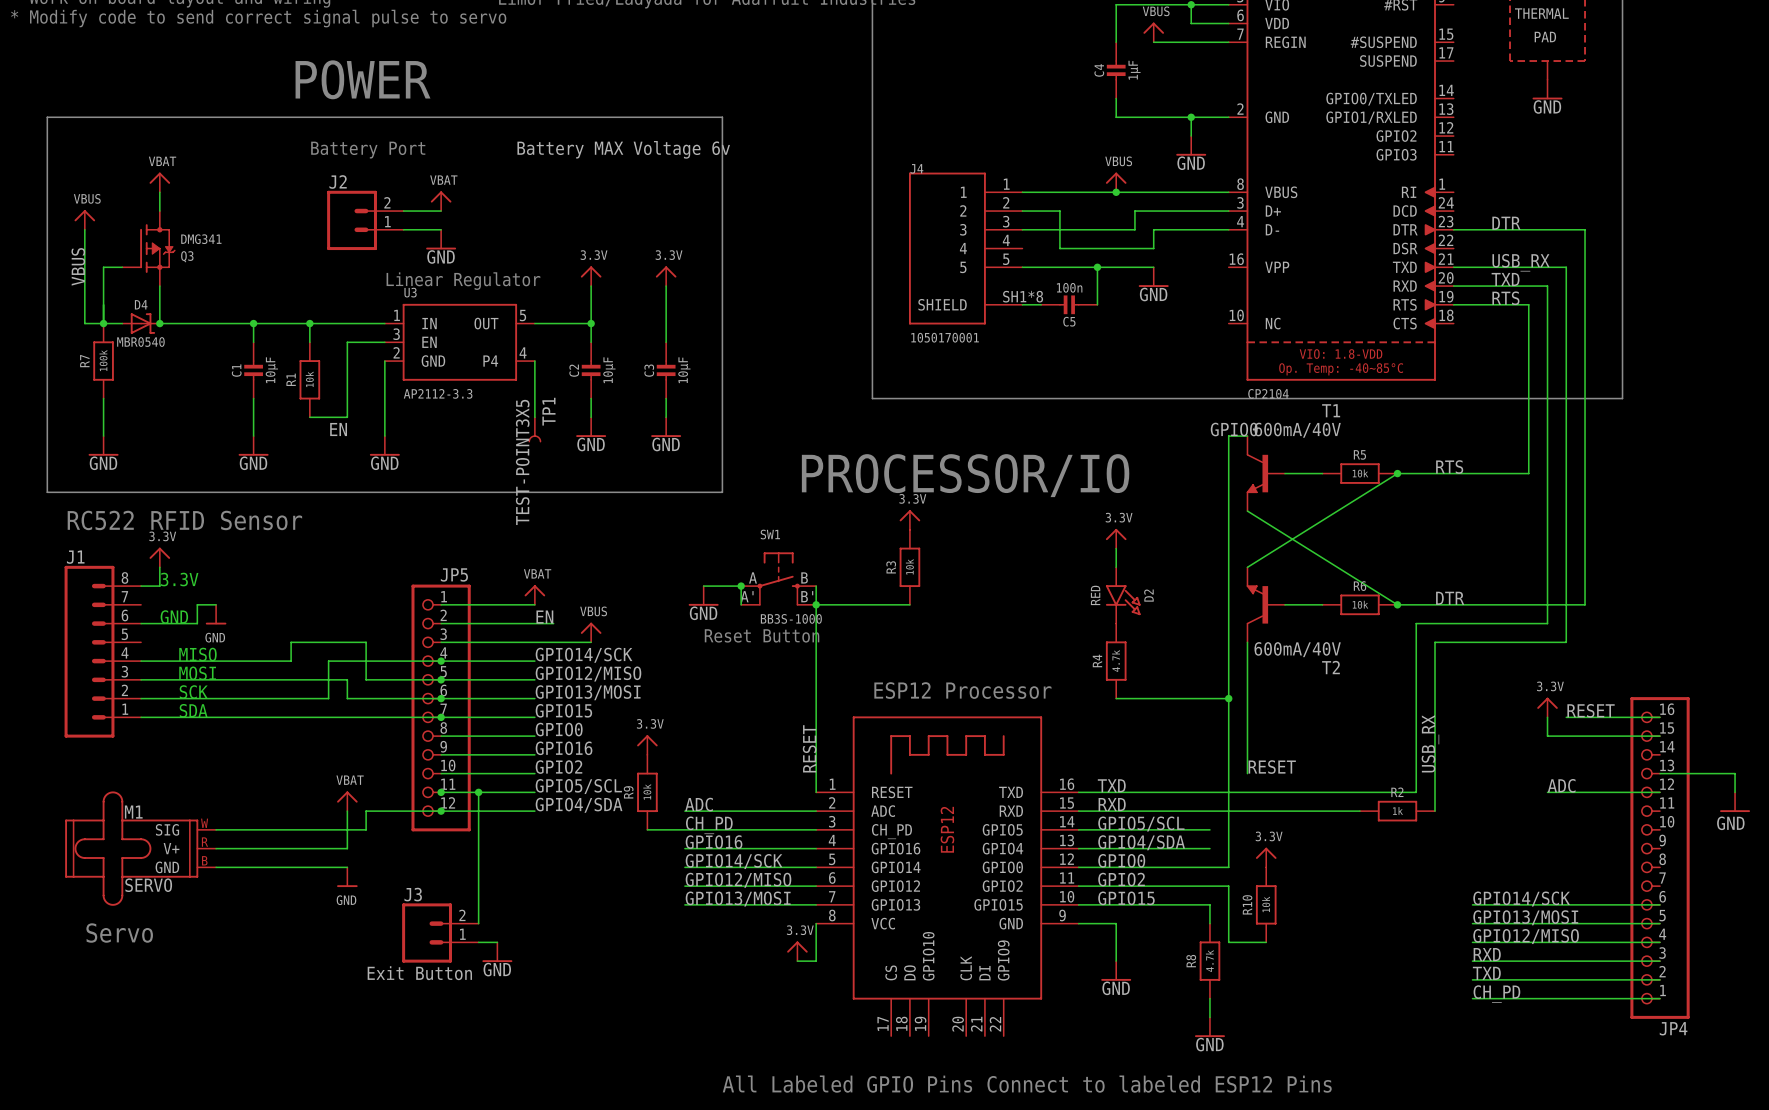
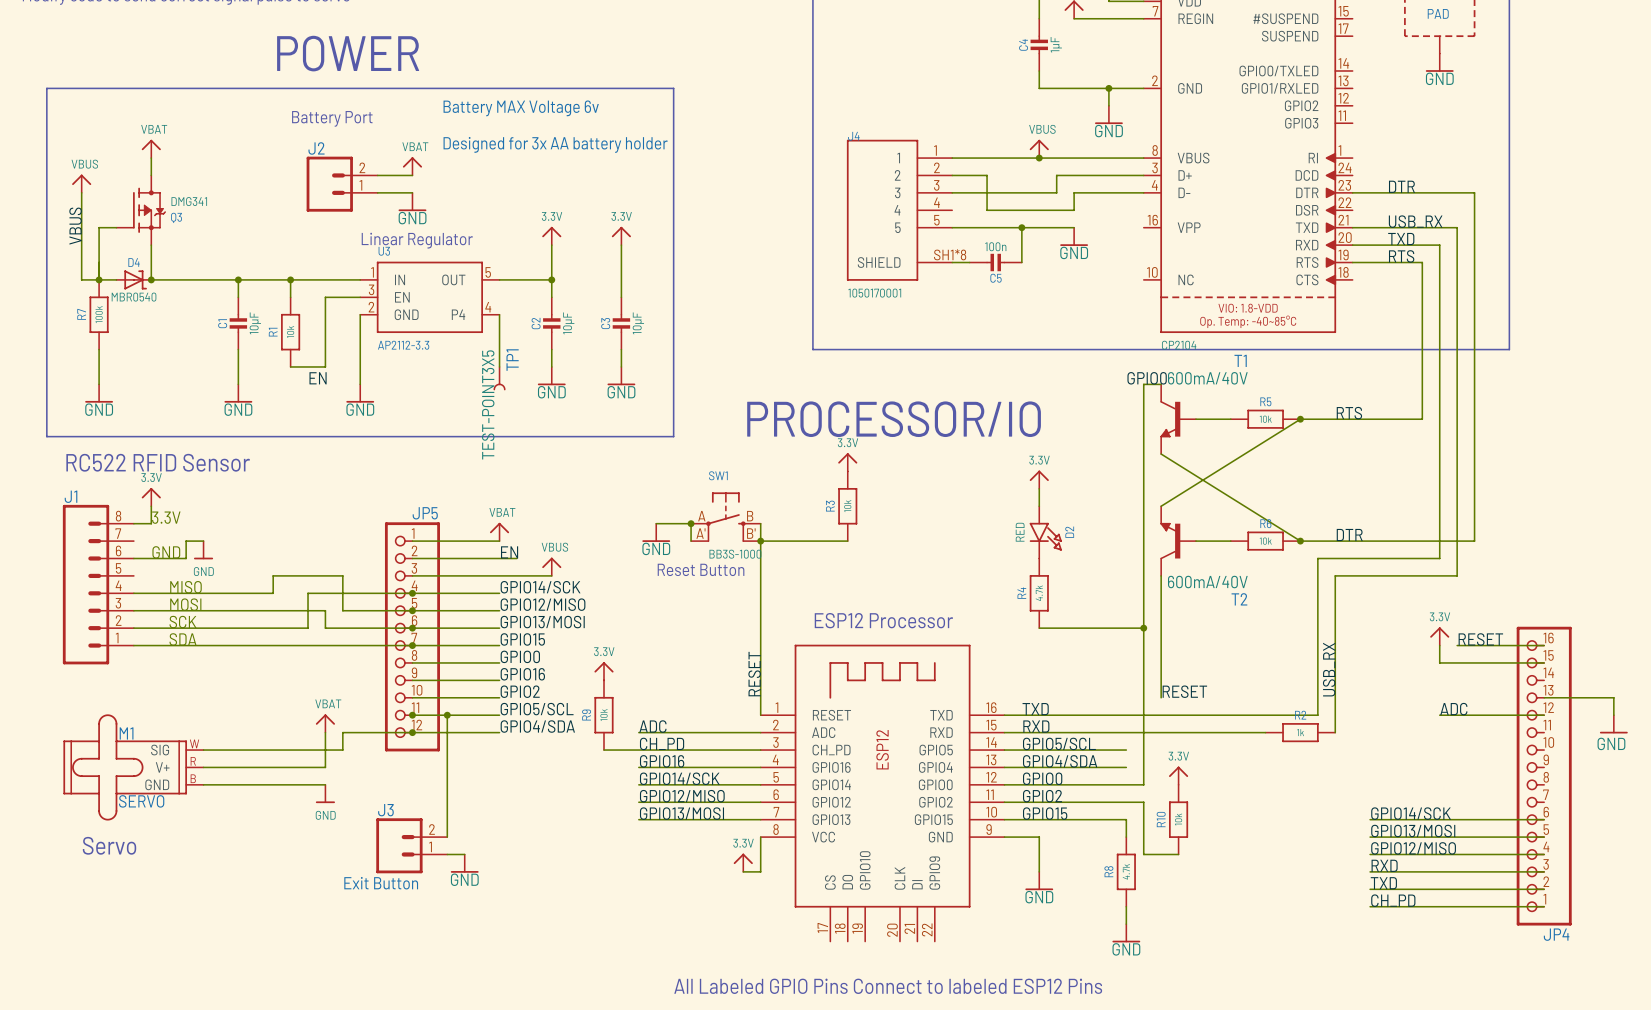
text position: Battery MAX Voltage 6v (623, 149) -> Battery MAX Voltage 6v (521, 108)
text: none -> Designed for 3x AA battery holder (555, 144)

